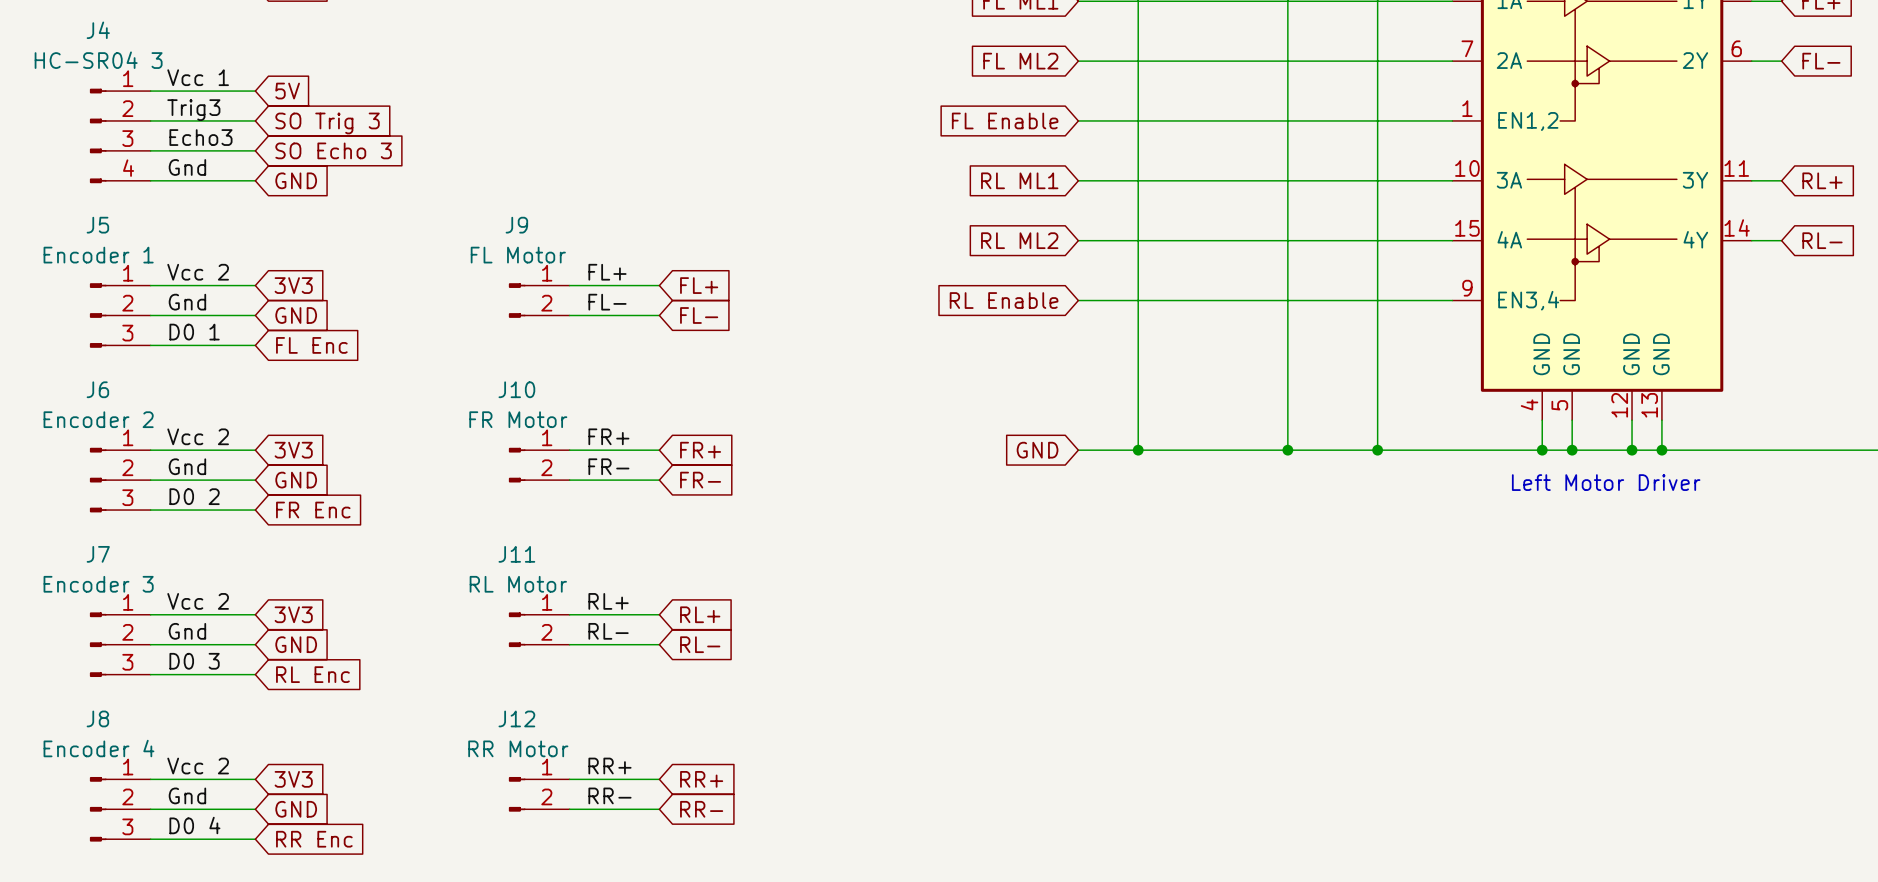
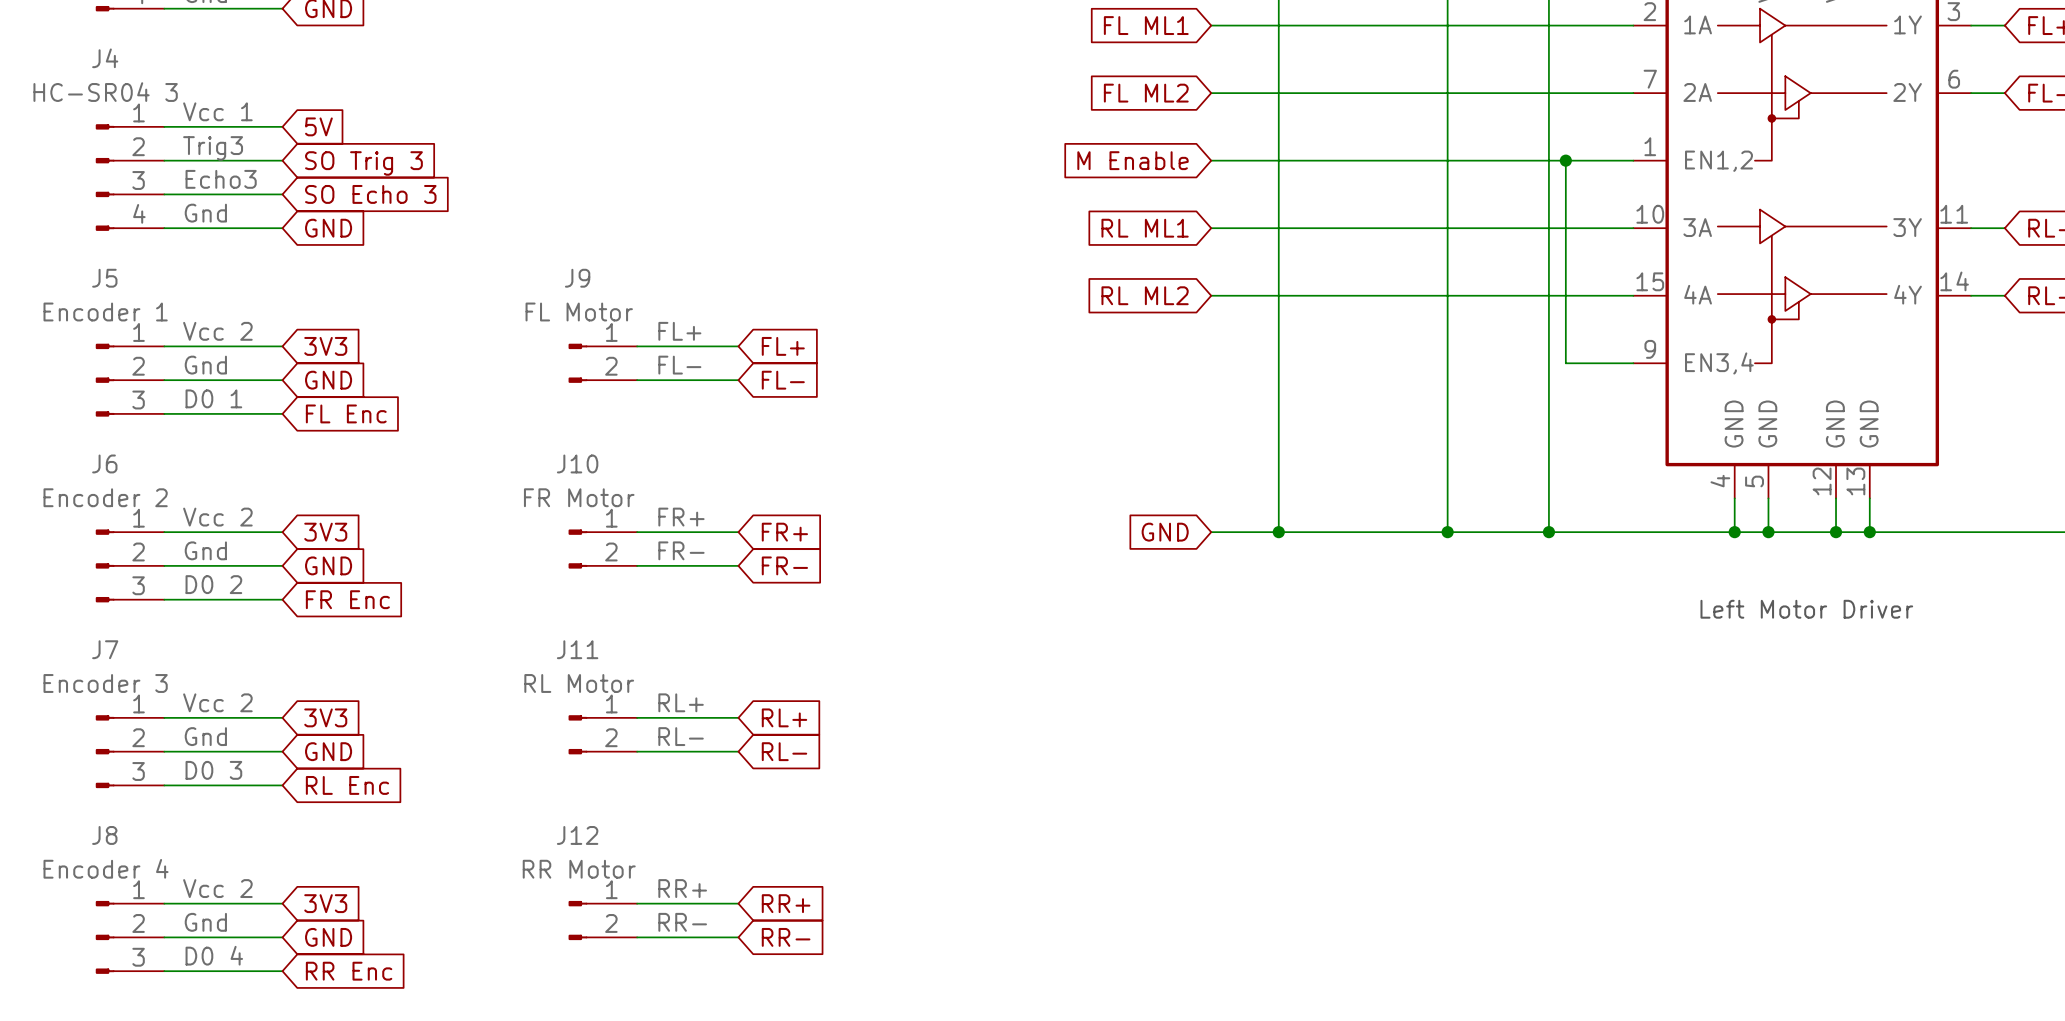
global label: FL Enable (1005, 120) -> M Enable (1133, 160)
junction: none -> (1565, 160)
global label: RL Enable (1004, 300) -> none
wire: (1078, 300) (1392, 300) -> (1565, 160) (1565, 363)
text position: Left Motor Driver (1606, 482) -> Left Motor Driver (1806, 609)

